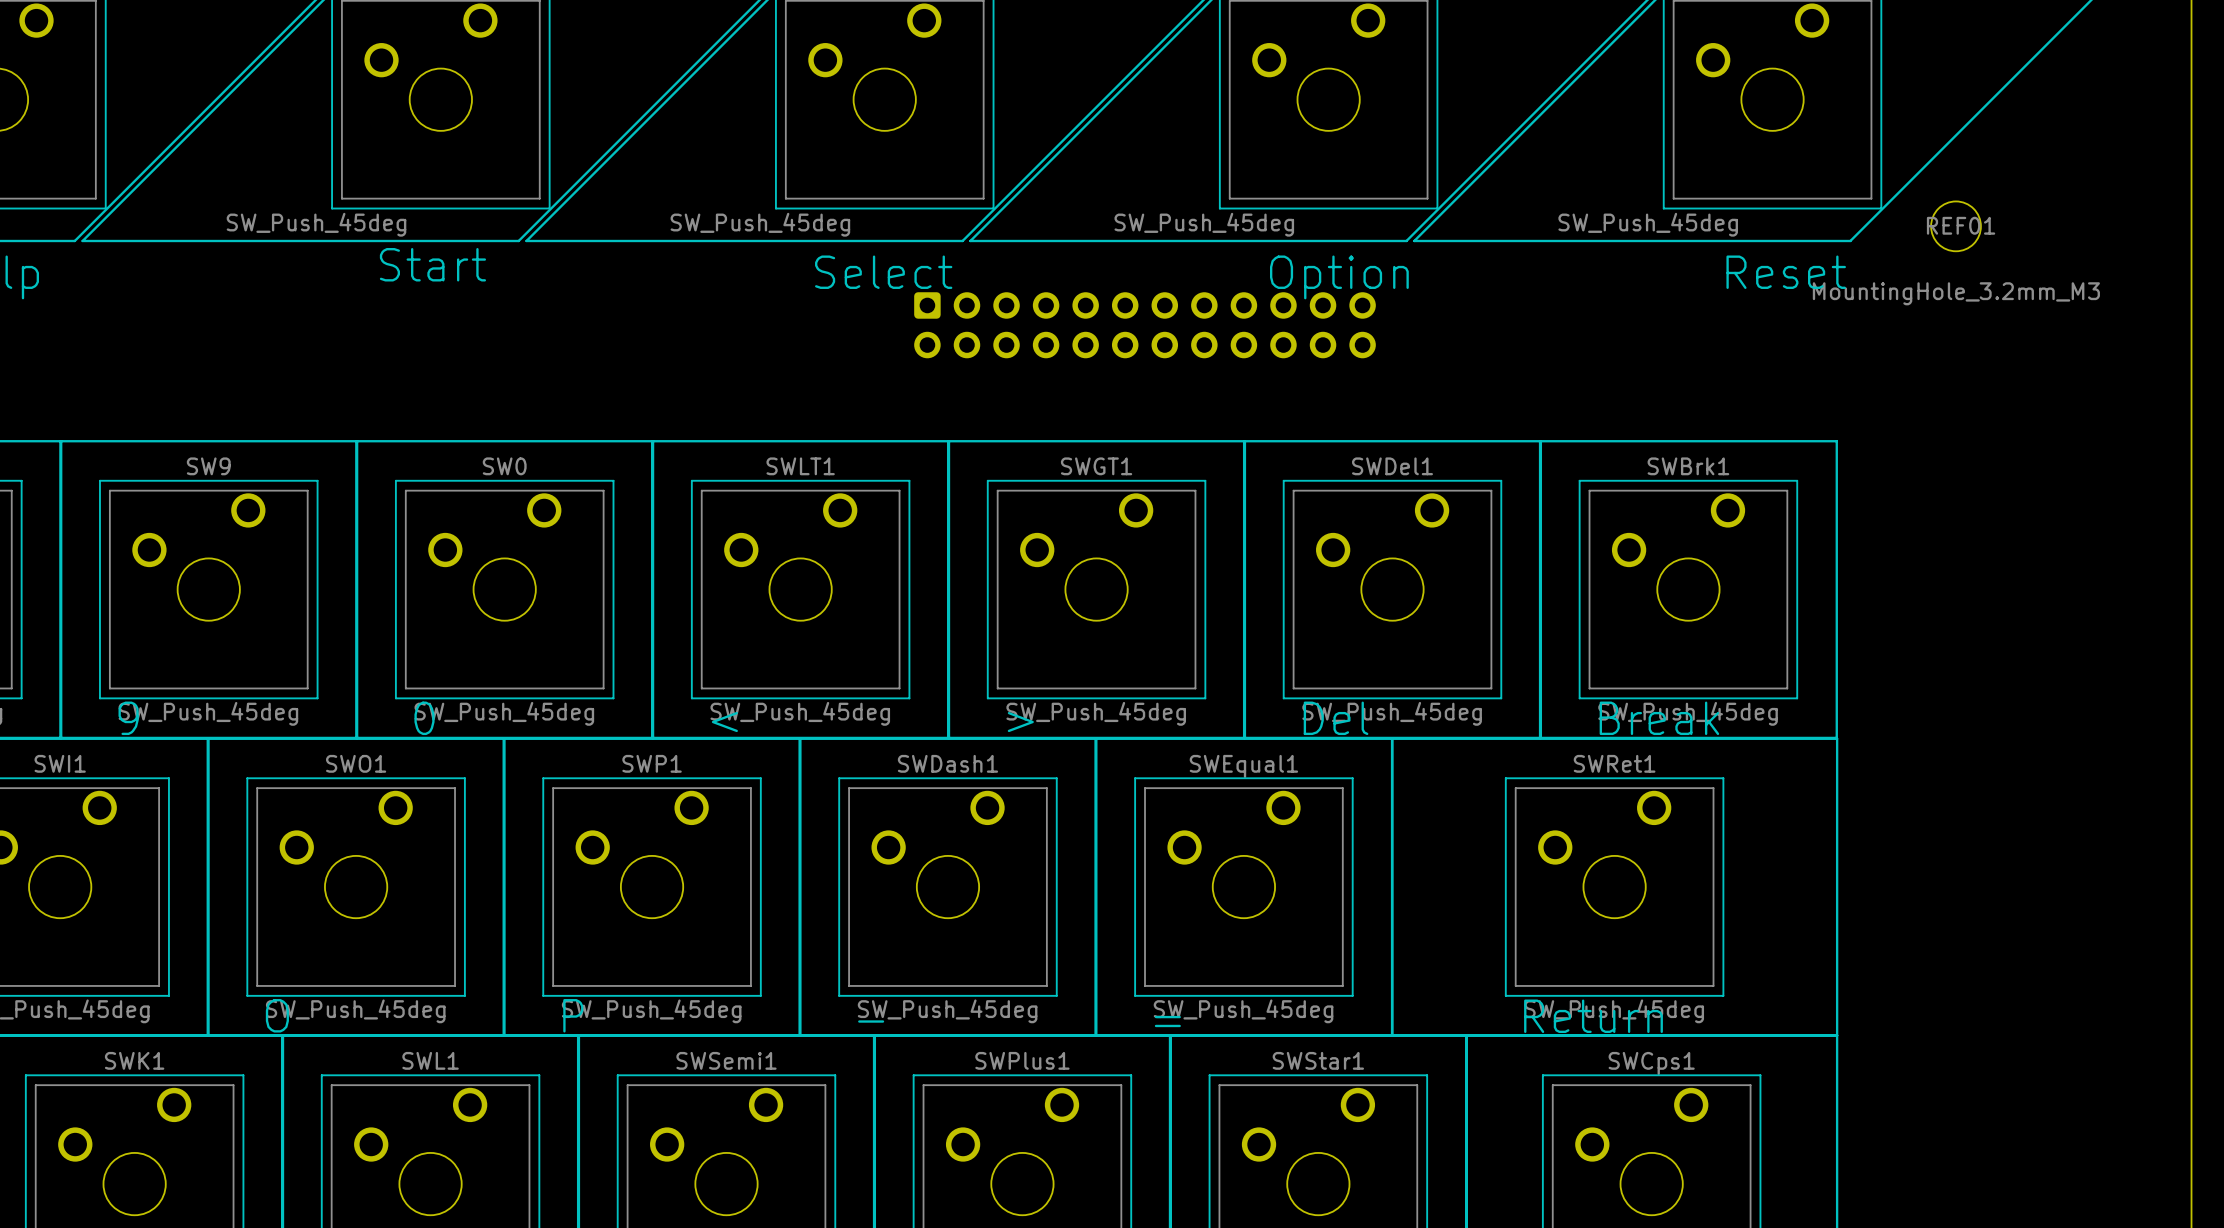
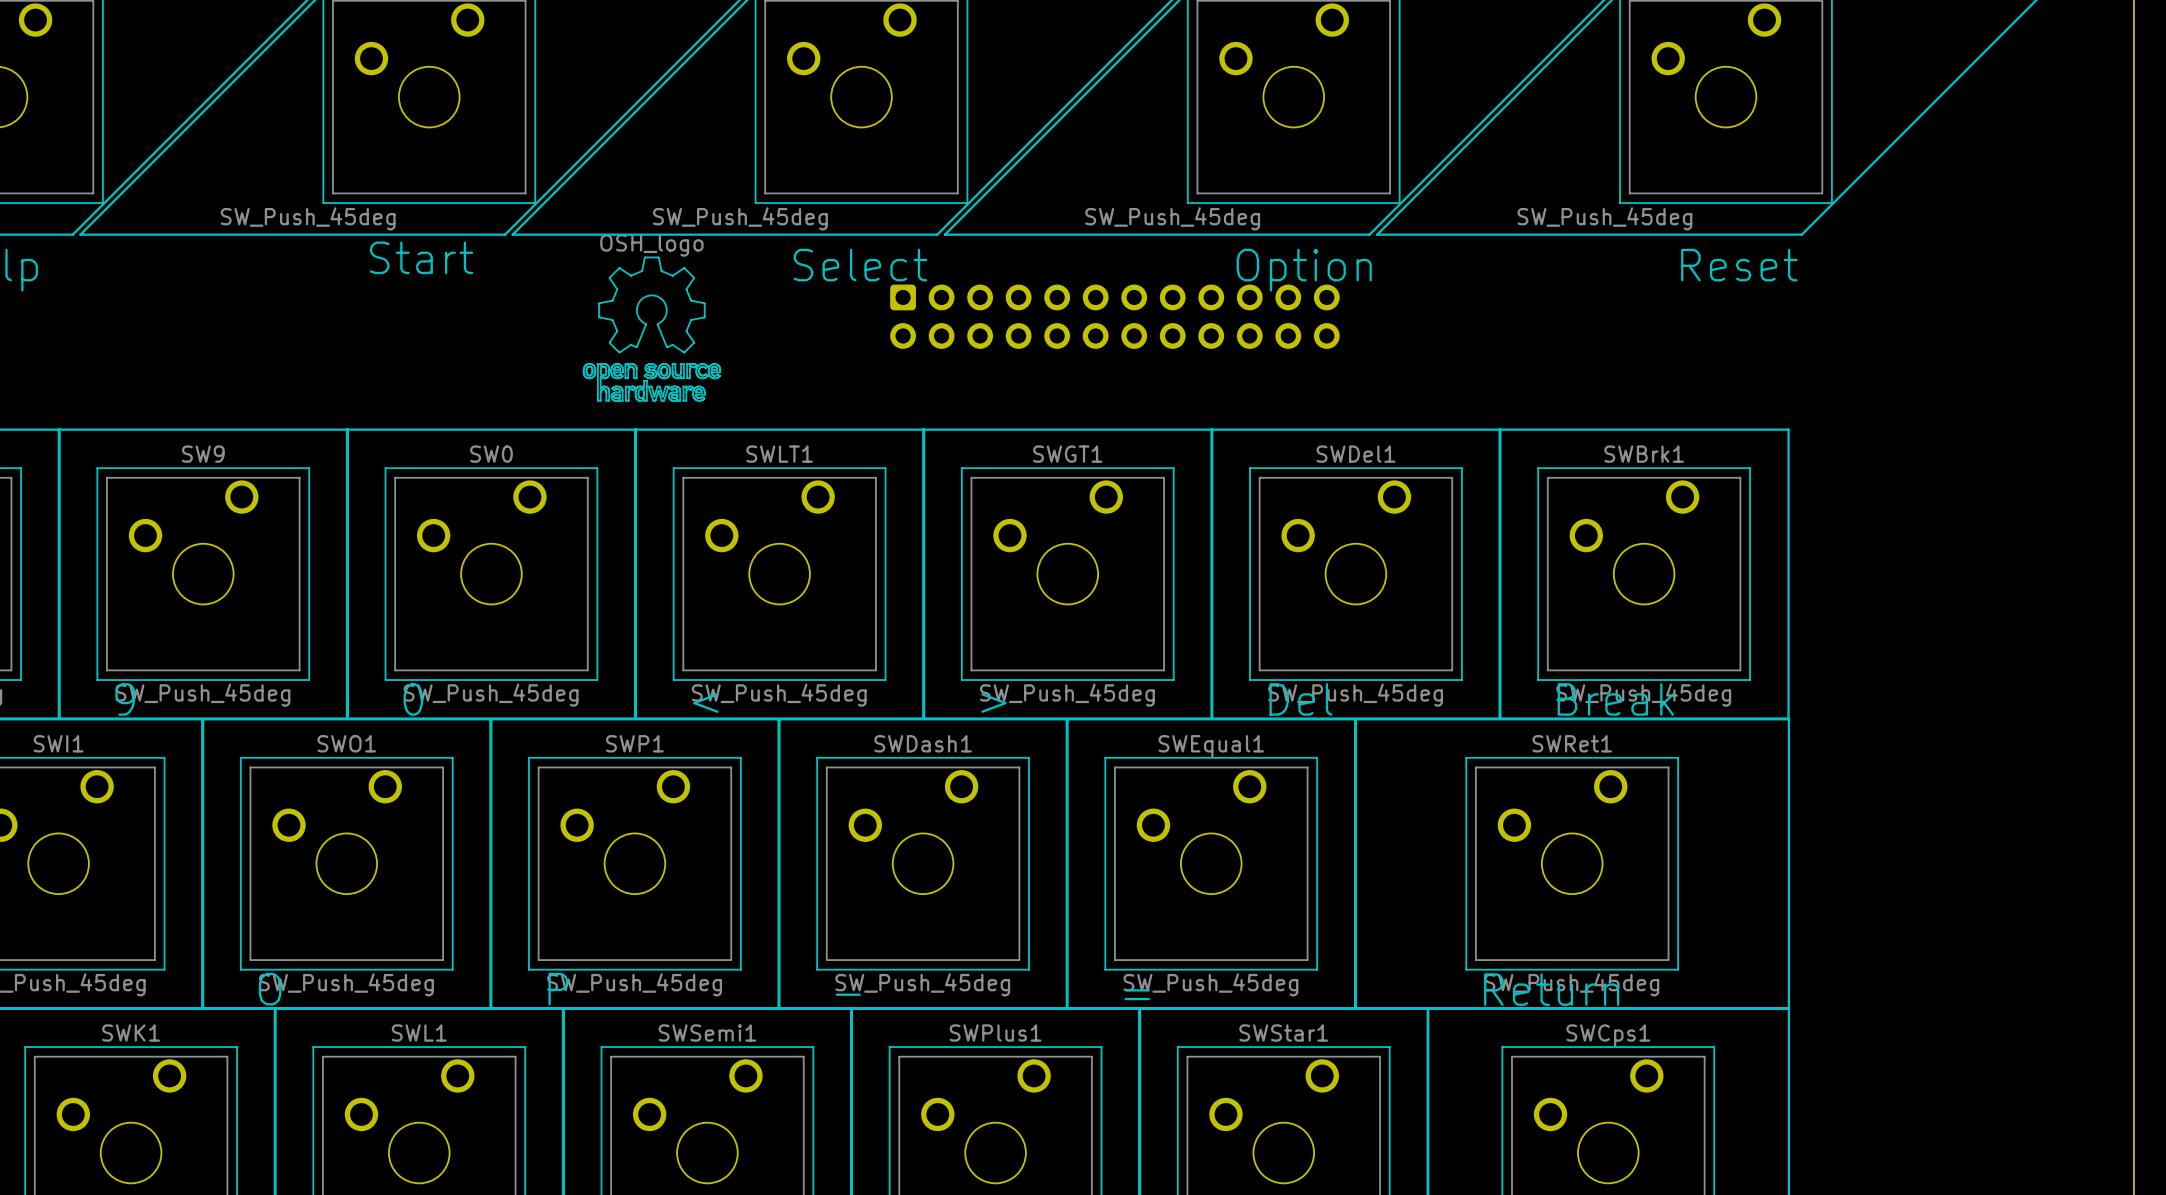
REF01: MountingHole_3.2mm_M3 (1956, 226) -> none
drawing: none -> [582, 256, 721, 402]

